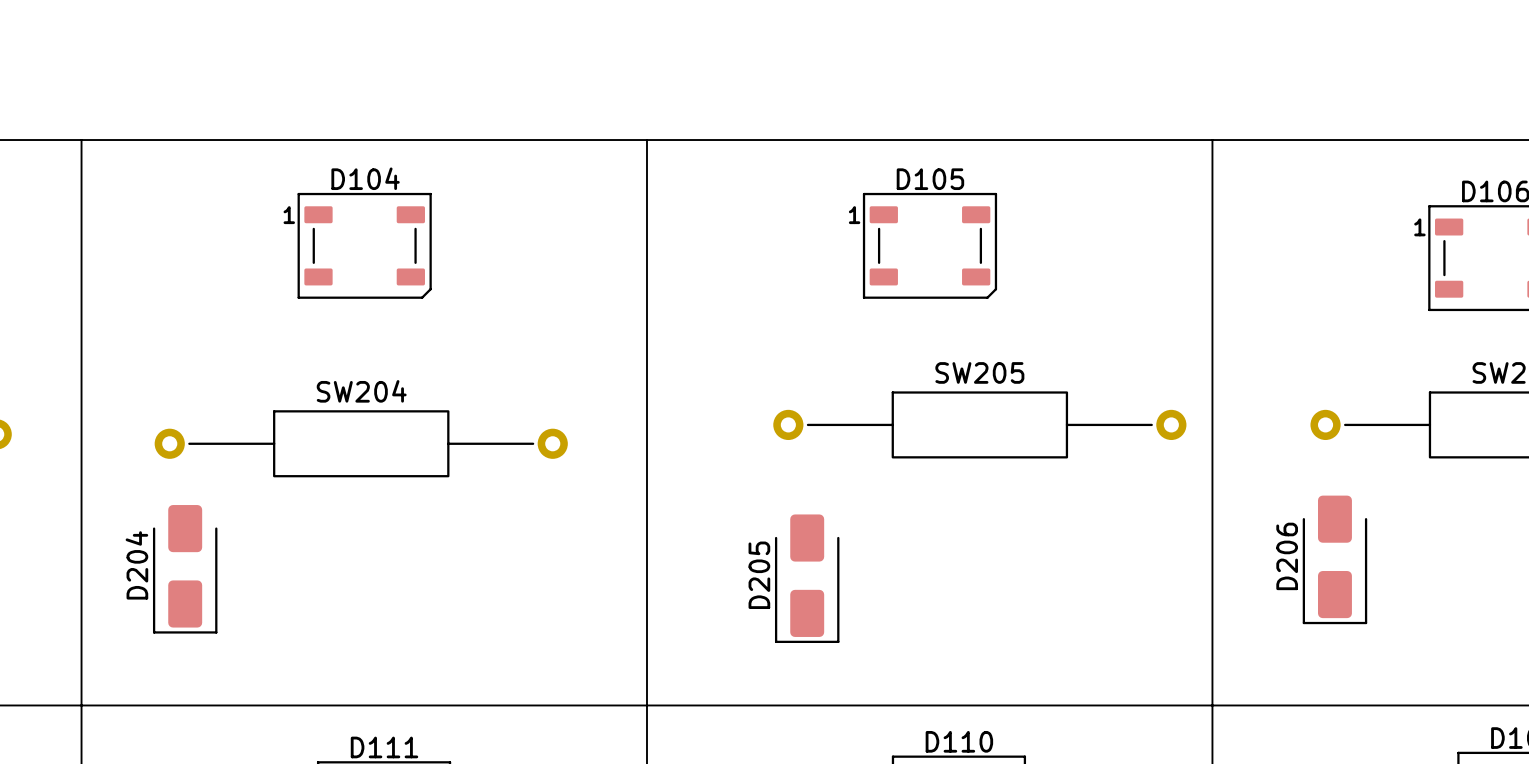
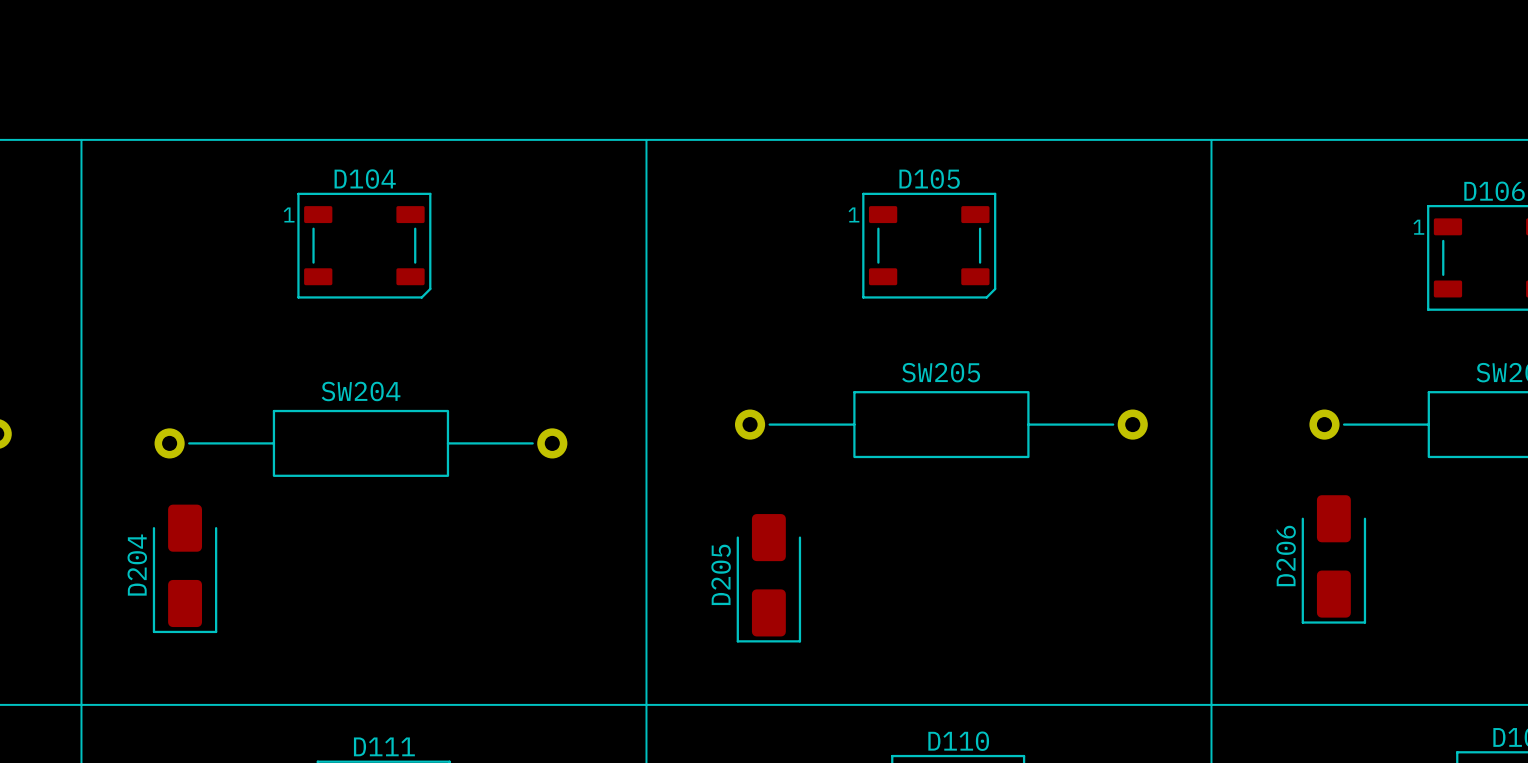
SW205 position: (979, 424) -> (941, 424)
D205 position: (807, 578) -> (768, 578)

